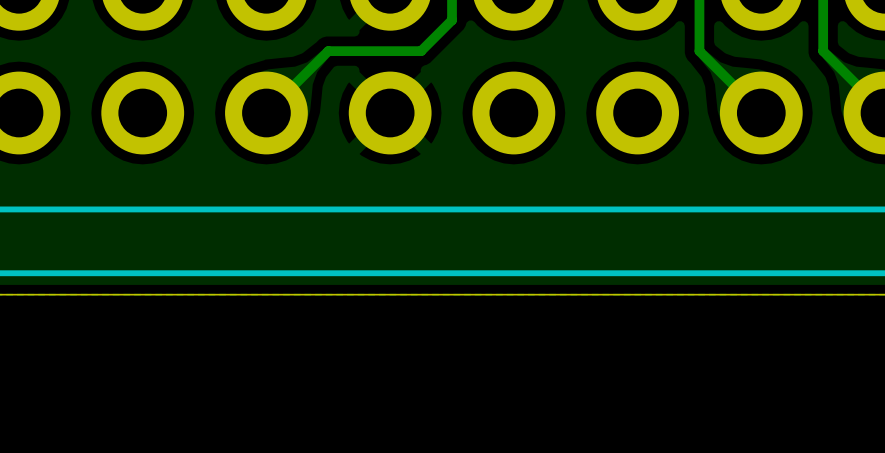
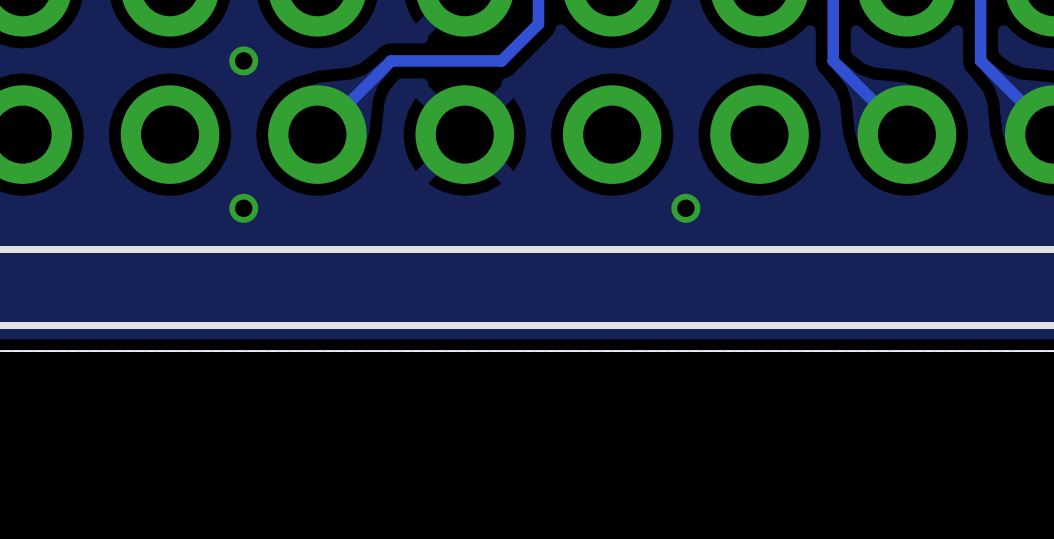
via: none -> (243, 60)
via: none -> (243, 208)
via: none -> (685, 208)

